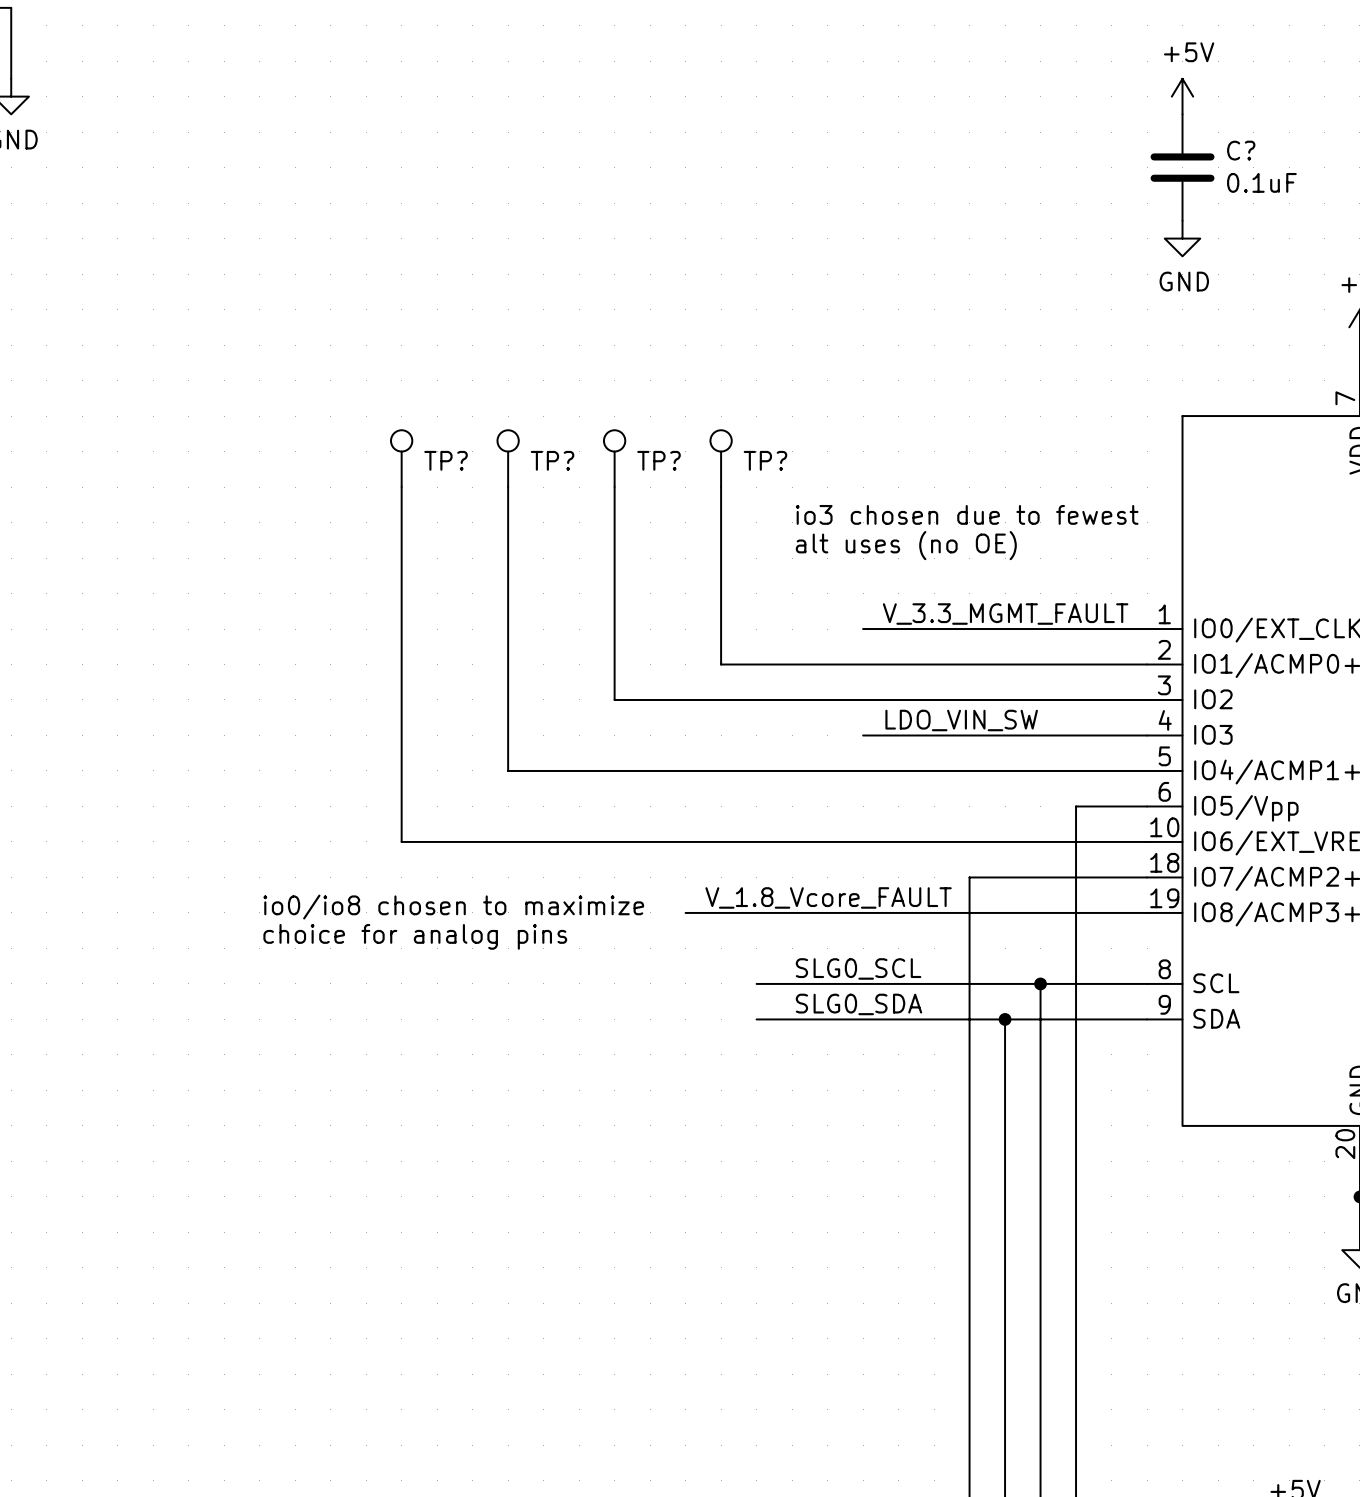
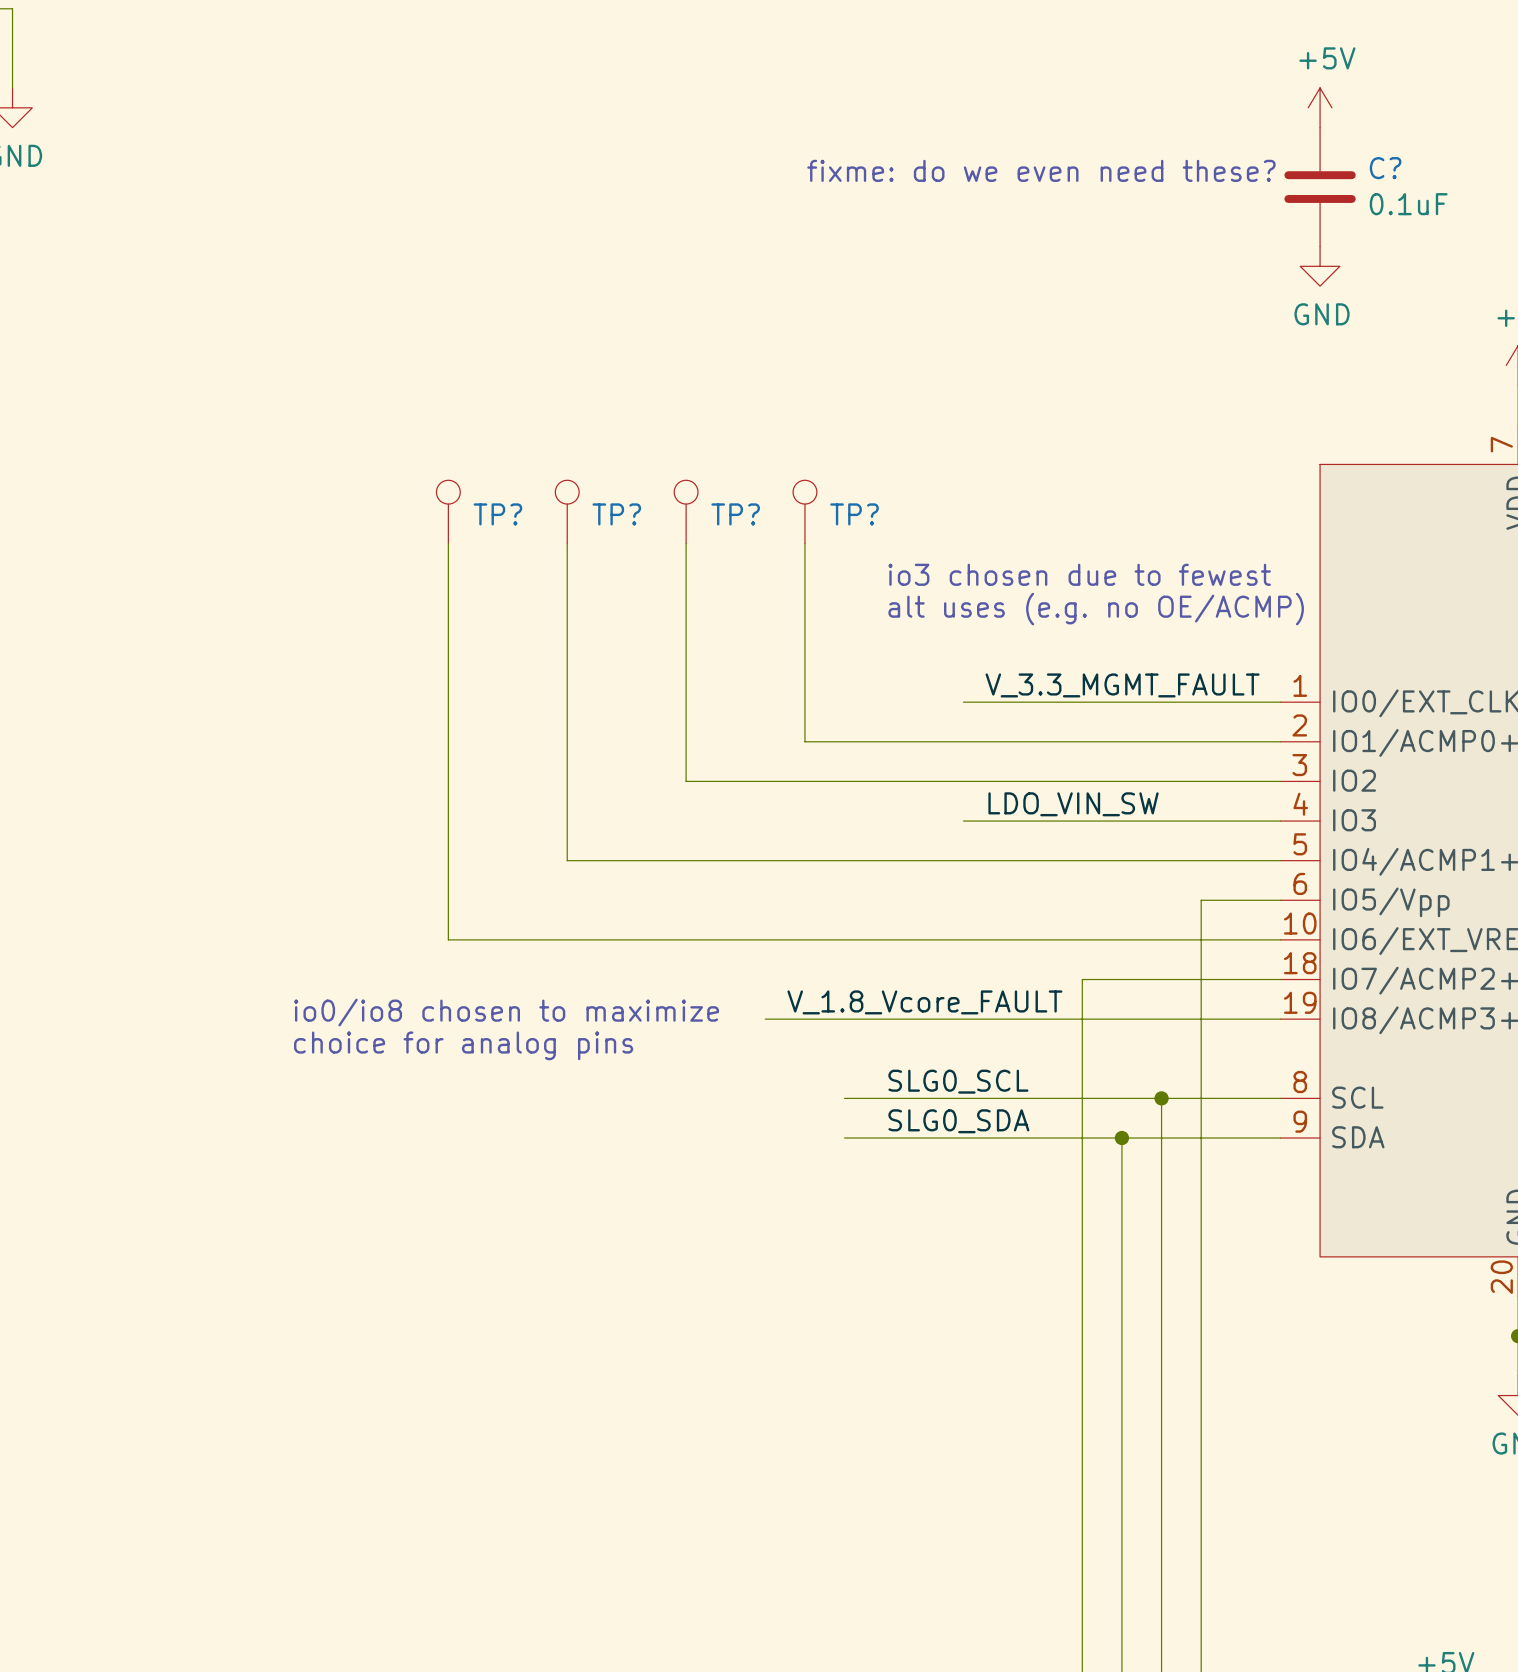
text: none -> fixme: do we even need these? (1041, 170)
text: alt uses (no OE) (906, 545) -> alt uses (e.g. no OE/ACMP) (1096, 609)

